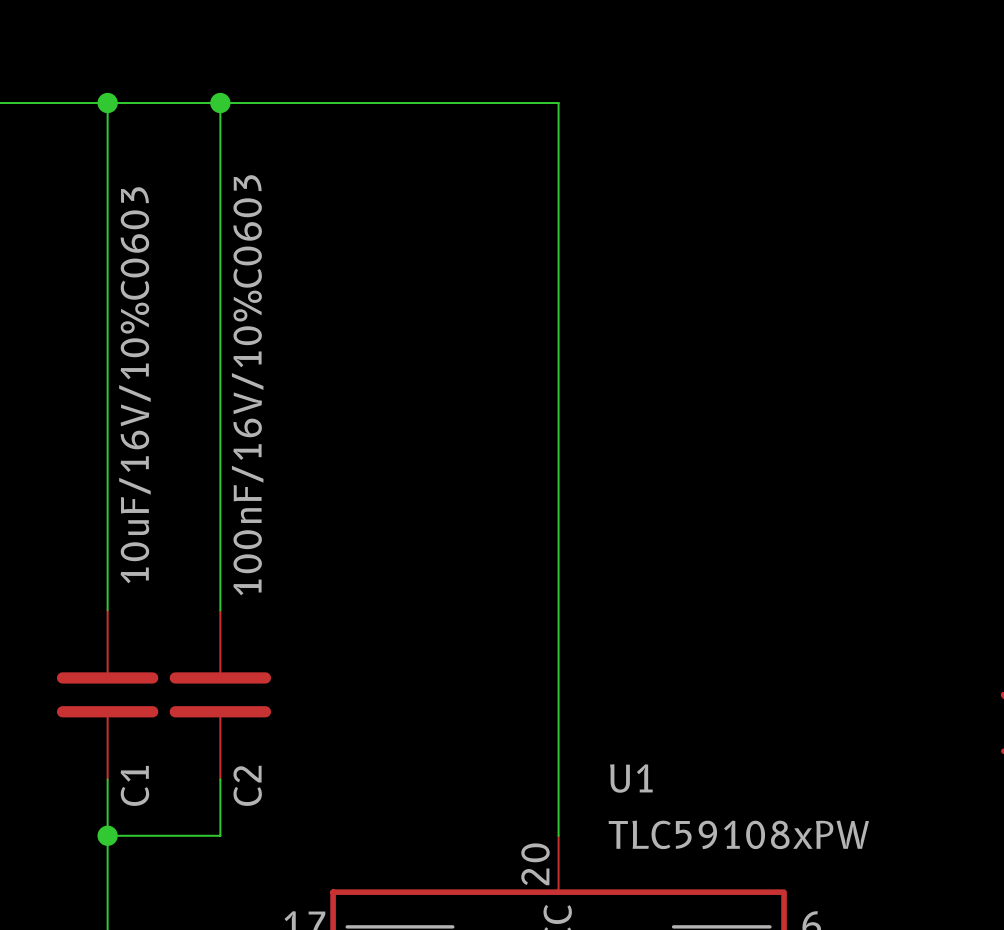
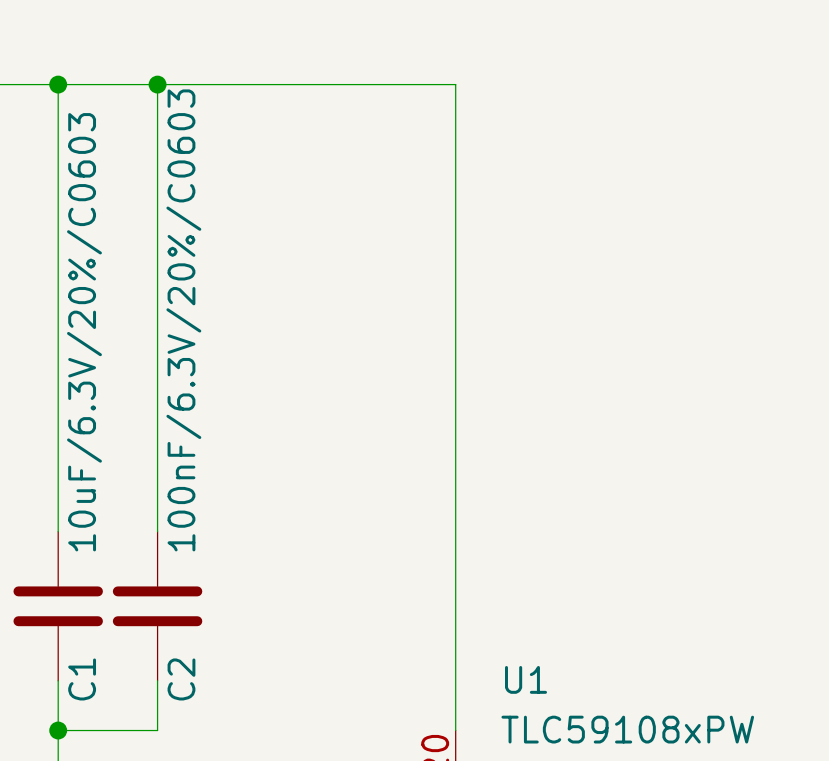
C1 value: 10uF/16V/10%C0603 (134, 385) -> 10uF/6.3V/20%/C0603 (84, 332)
C2 value: 100nF/16V/10%C0603 (247, 385) -> 100nF/6.3V/20%/C0603 (183, 320)

